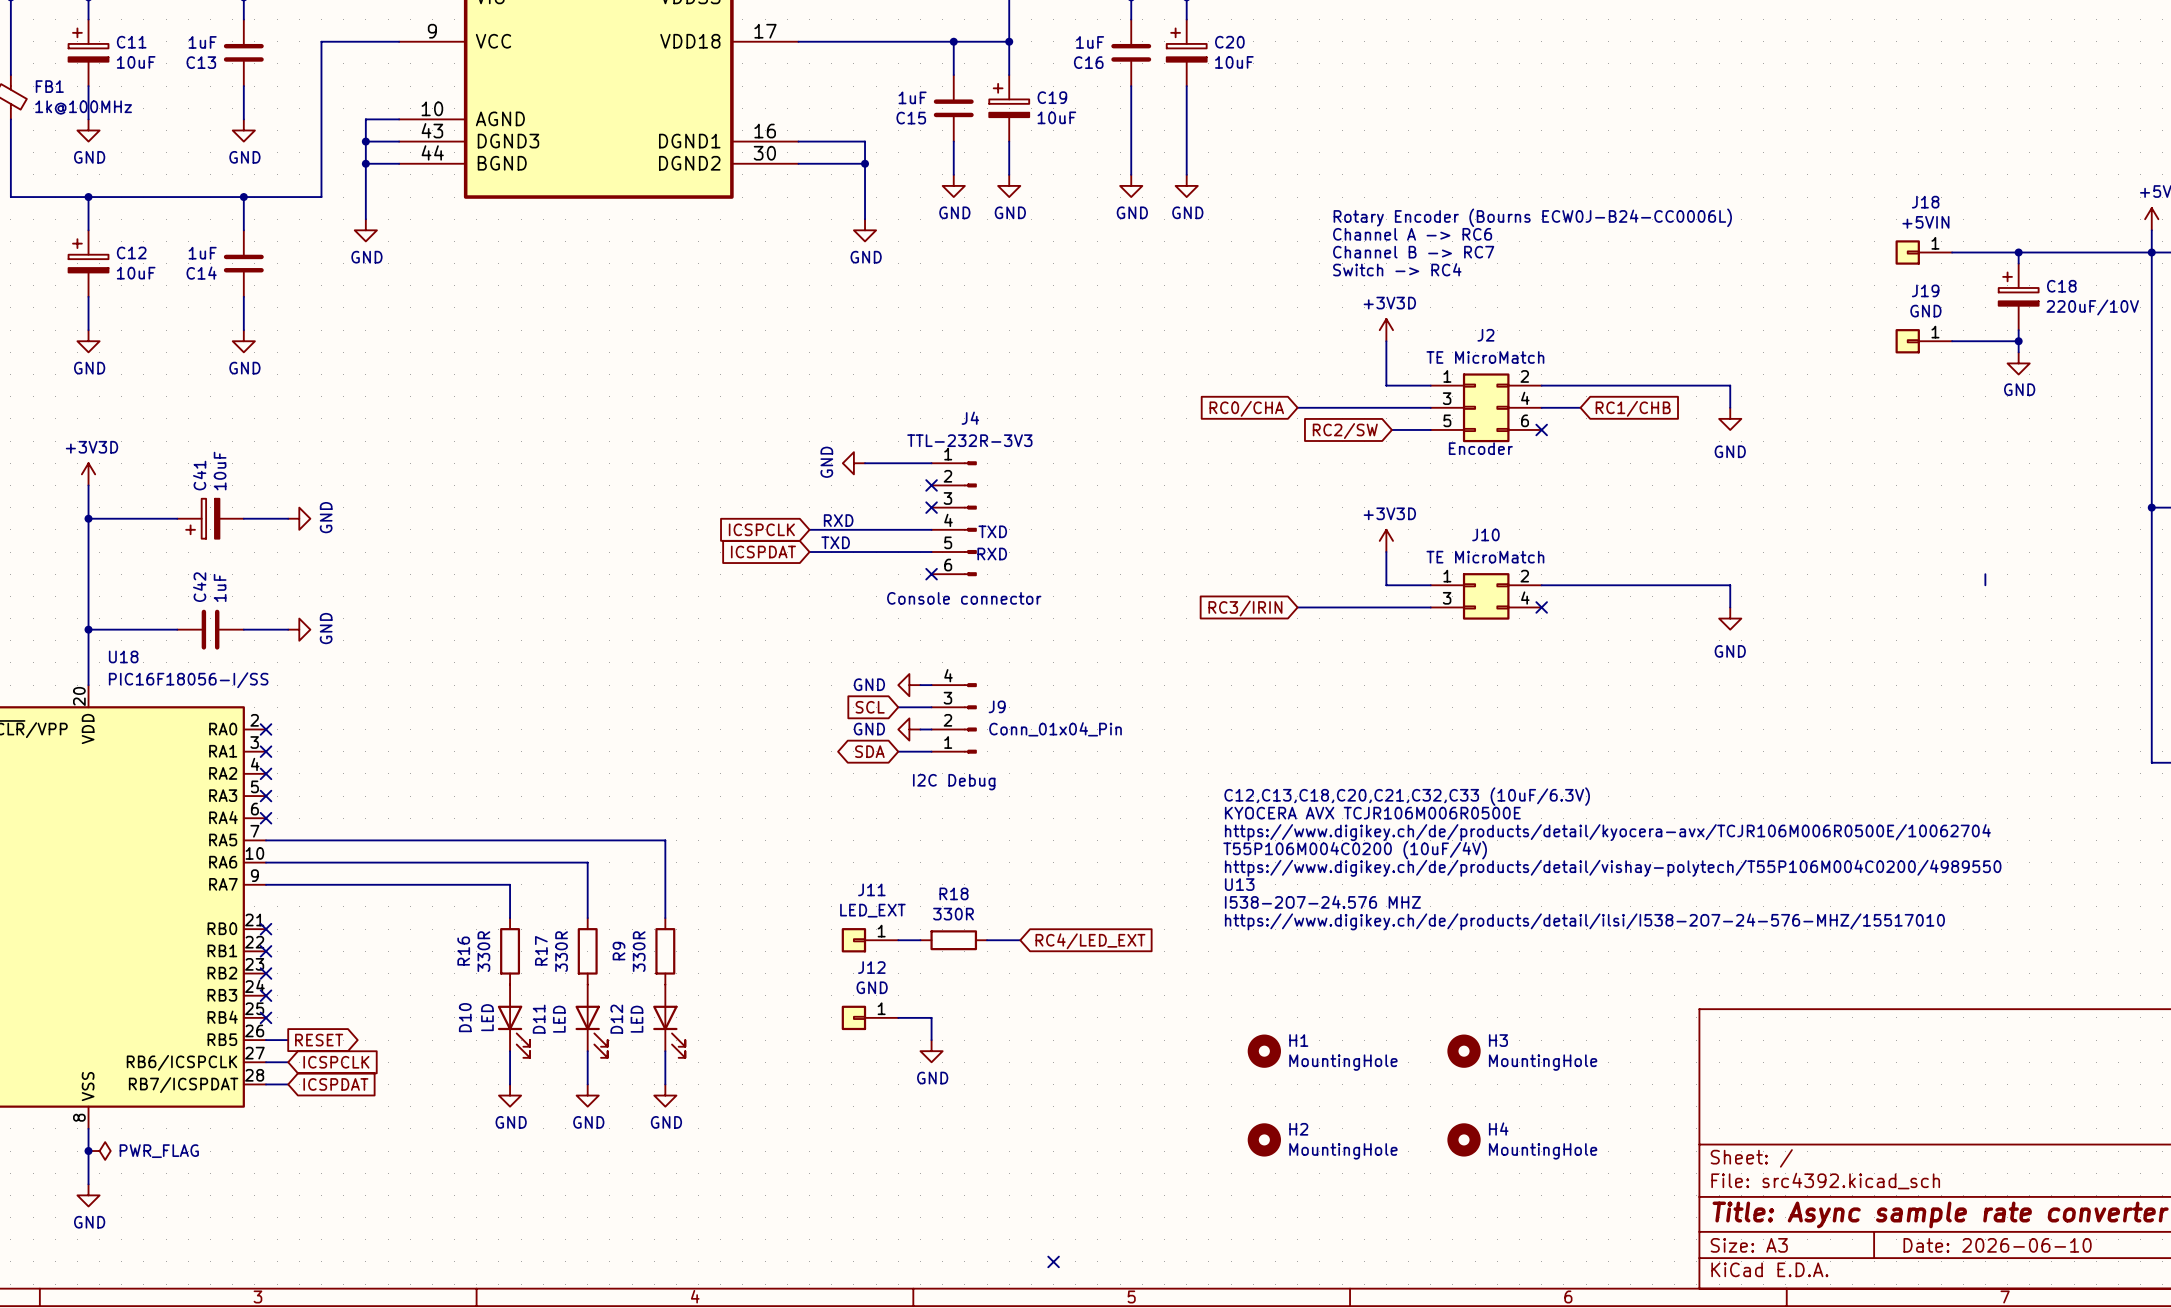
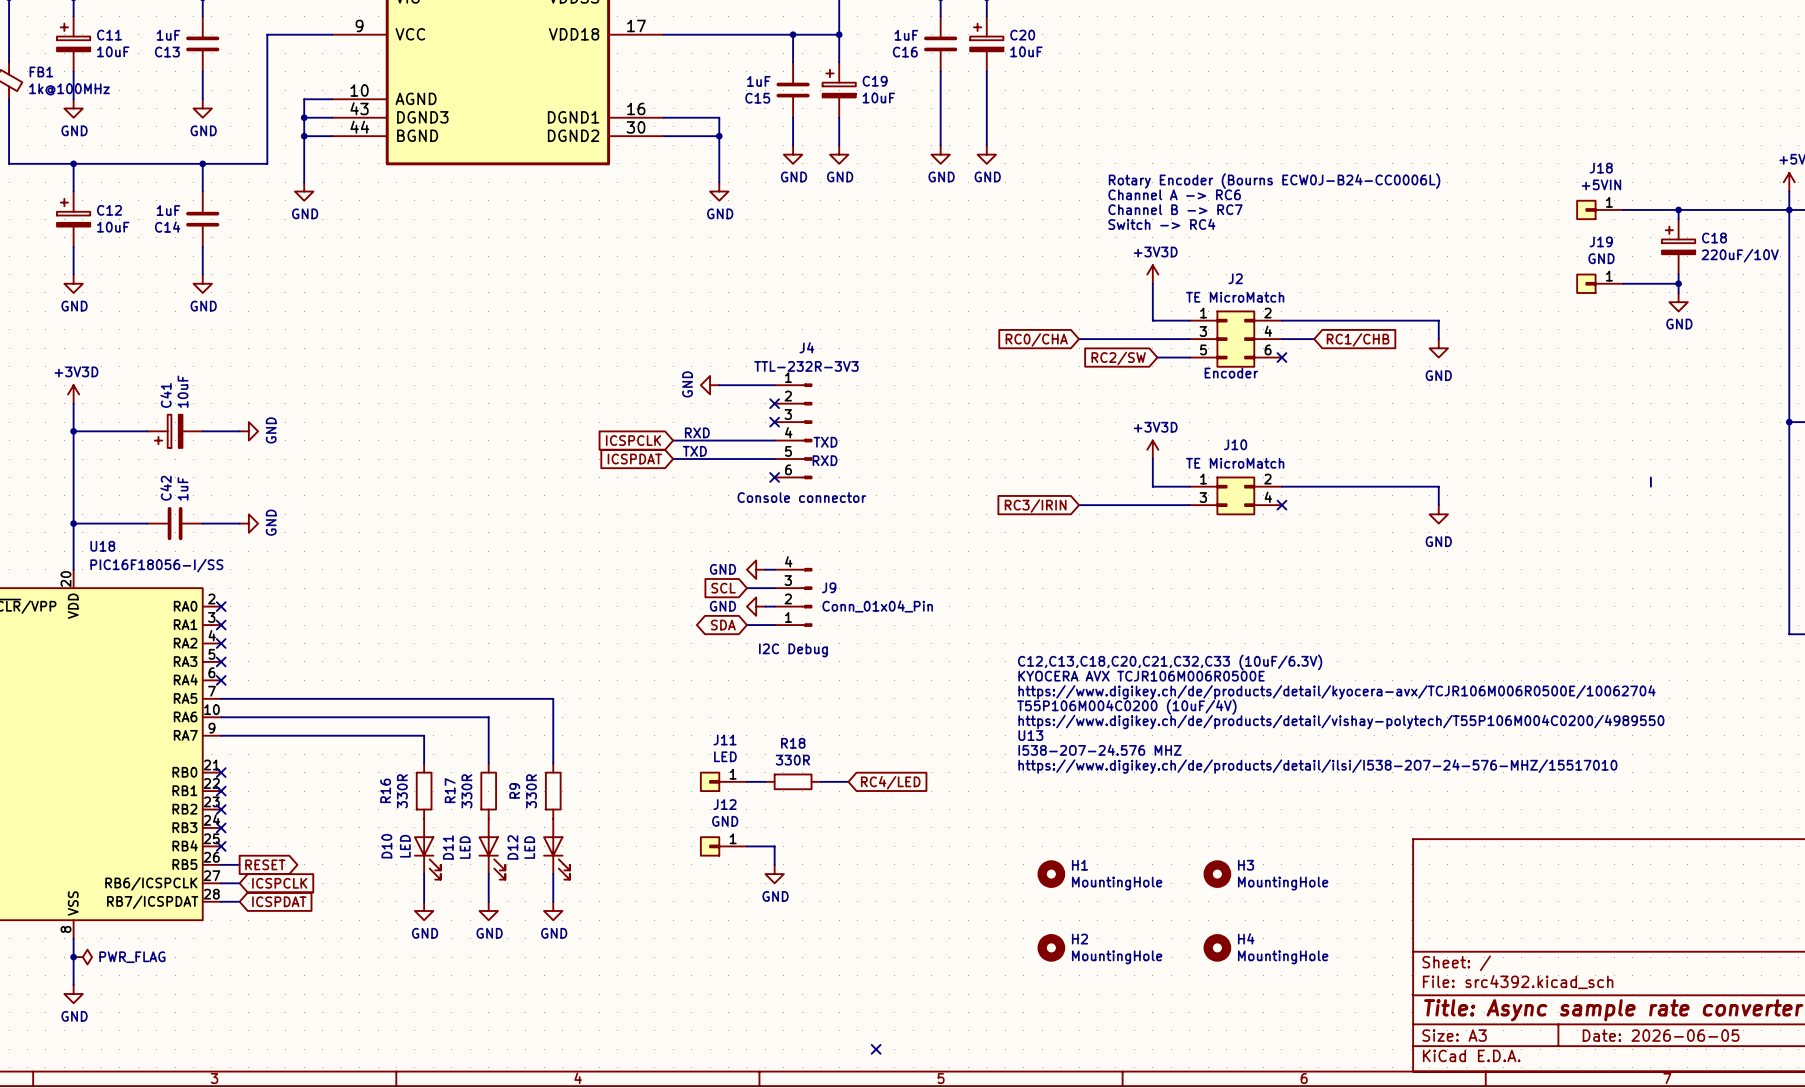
J11 value: LED_EXT (872, 910) -> LED (725, 756)
global label: RC4/LED_EXT (1090, 941) -> RC4/LED (890, 782)
title block: Date: 2026-06-10 (1997, 1245) -> Date: 2026-06-05 (1661, 1035)

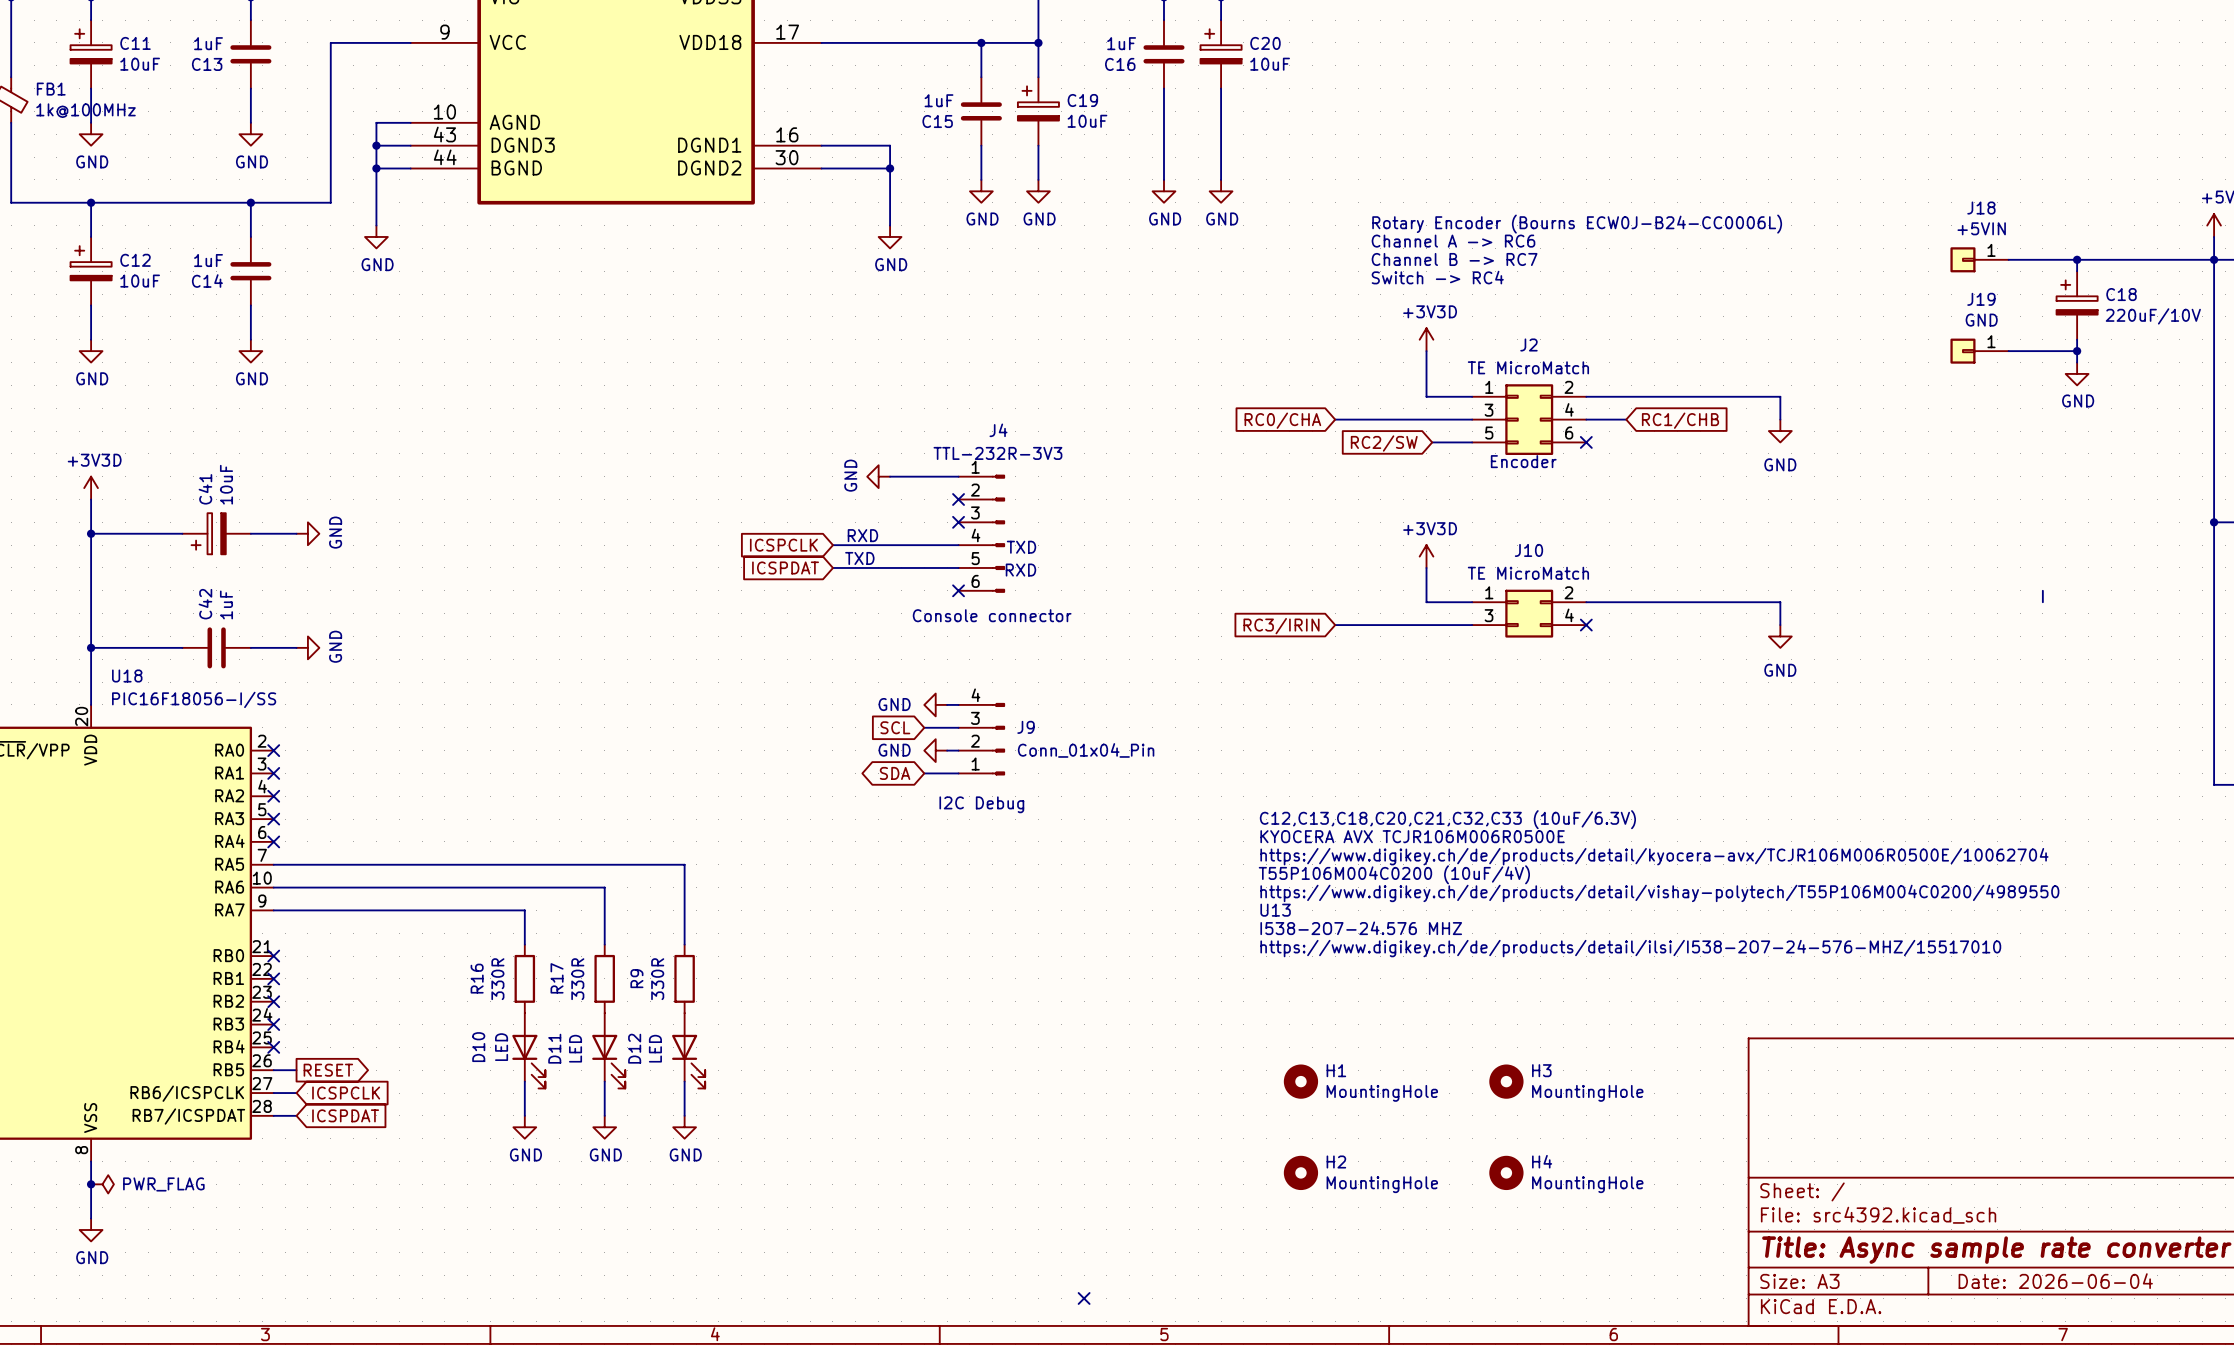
J11: LED (723, 781) -> none
wire: (746, 781) (765, 781) -> none
R18: 330R (793, 781) -> none
wire: (820, 781) (848, 781) -> none
global label: RC4/LED (890, 782) -> none
J12: GND (723, 846) -> none
wire: (746, 846) (774, 846) (774, 864) -> none
power symbol: GND (774, 874) -> none
title block: Date: 2026-06-05 (1661, 1035) -> Date: 2026-06-04 (2055, 1281)

